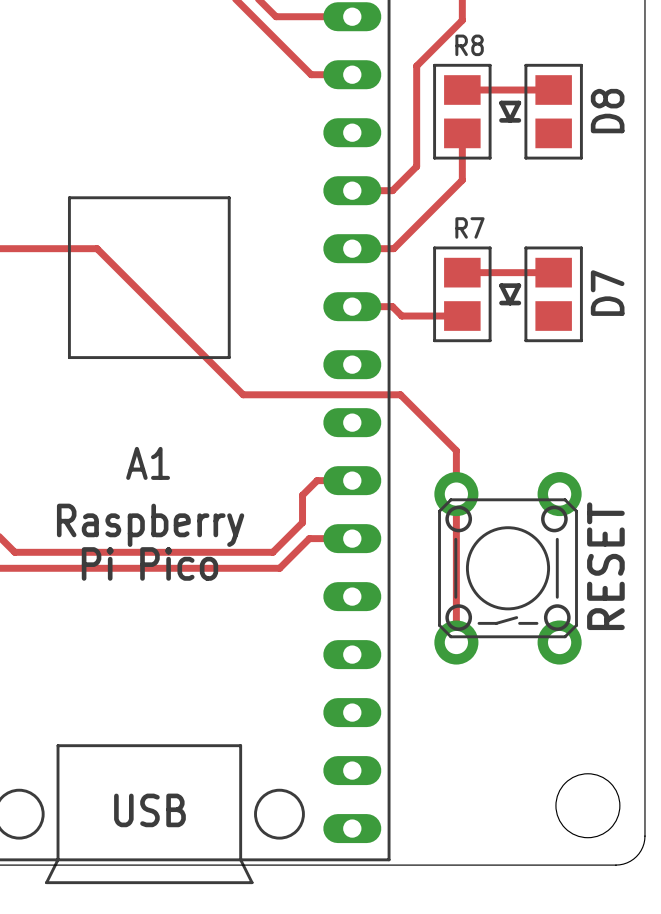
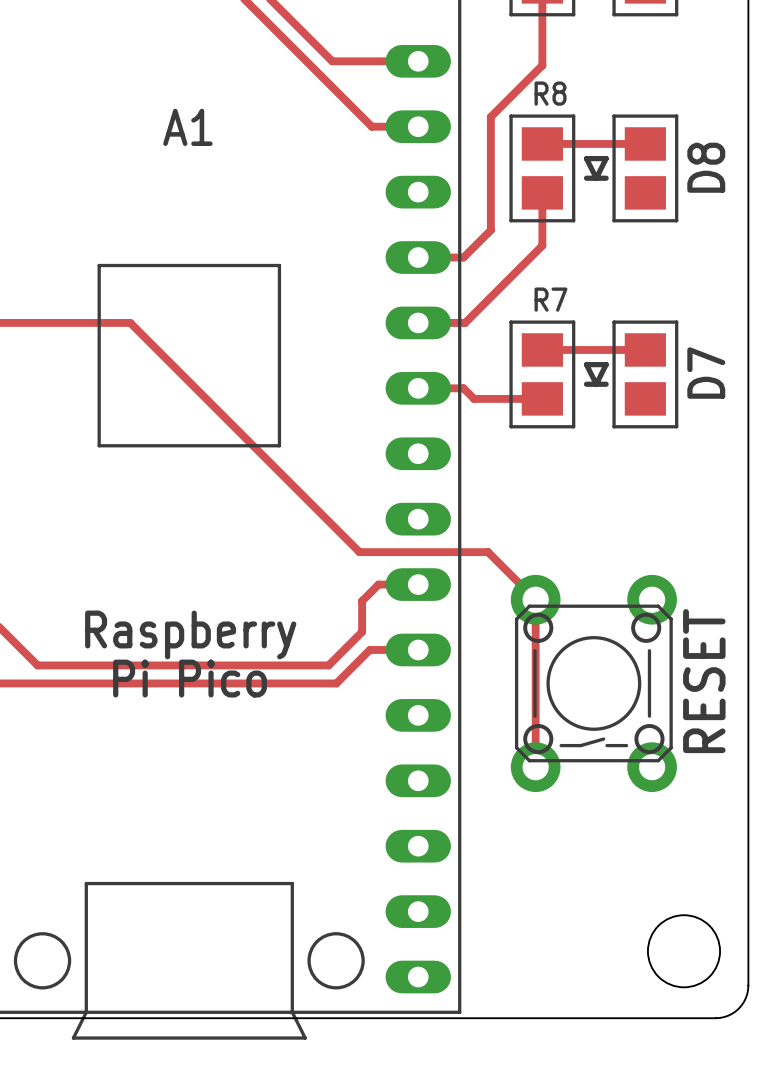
track: (243, 394) (400, 394) (456, 450) (456, 494) -> (295, 487) (359, 552) (488, 552) (535, 599)
A1 name position: A1 (148, 463) -> A1 (187, 127)
A1 text: USB (149, 810) -> none

